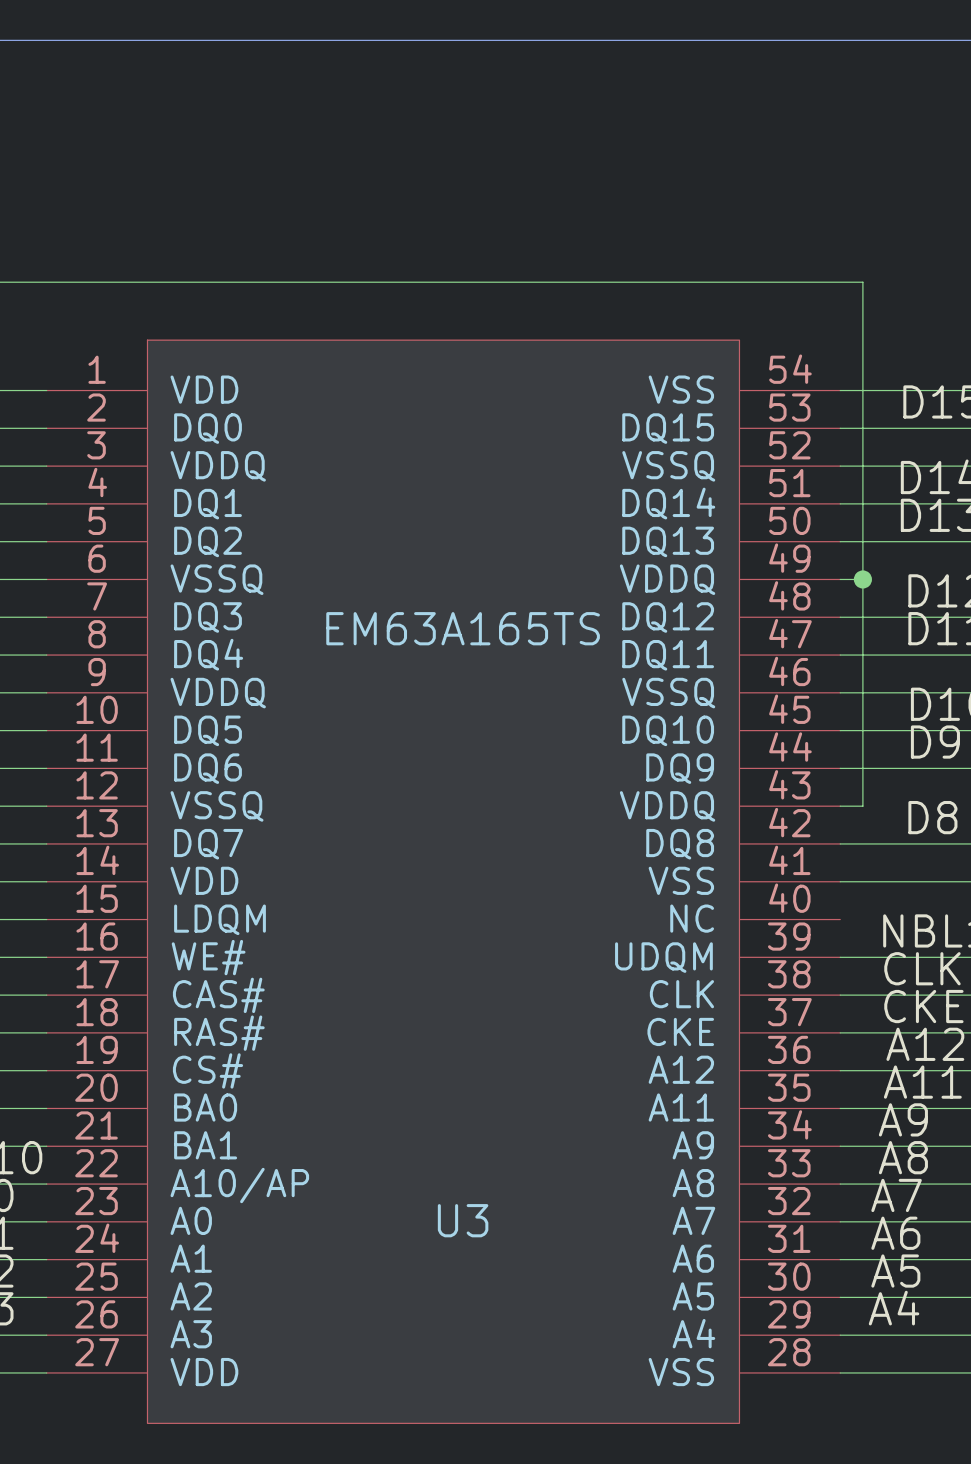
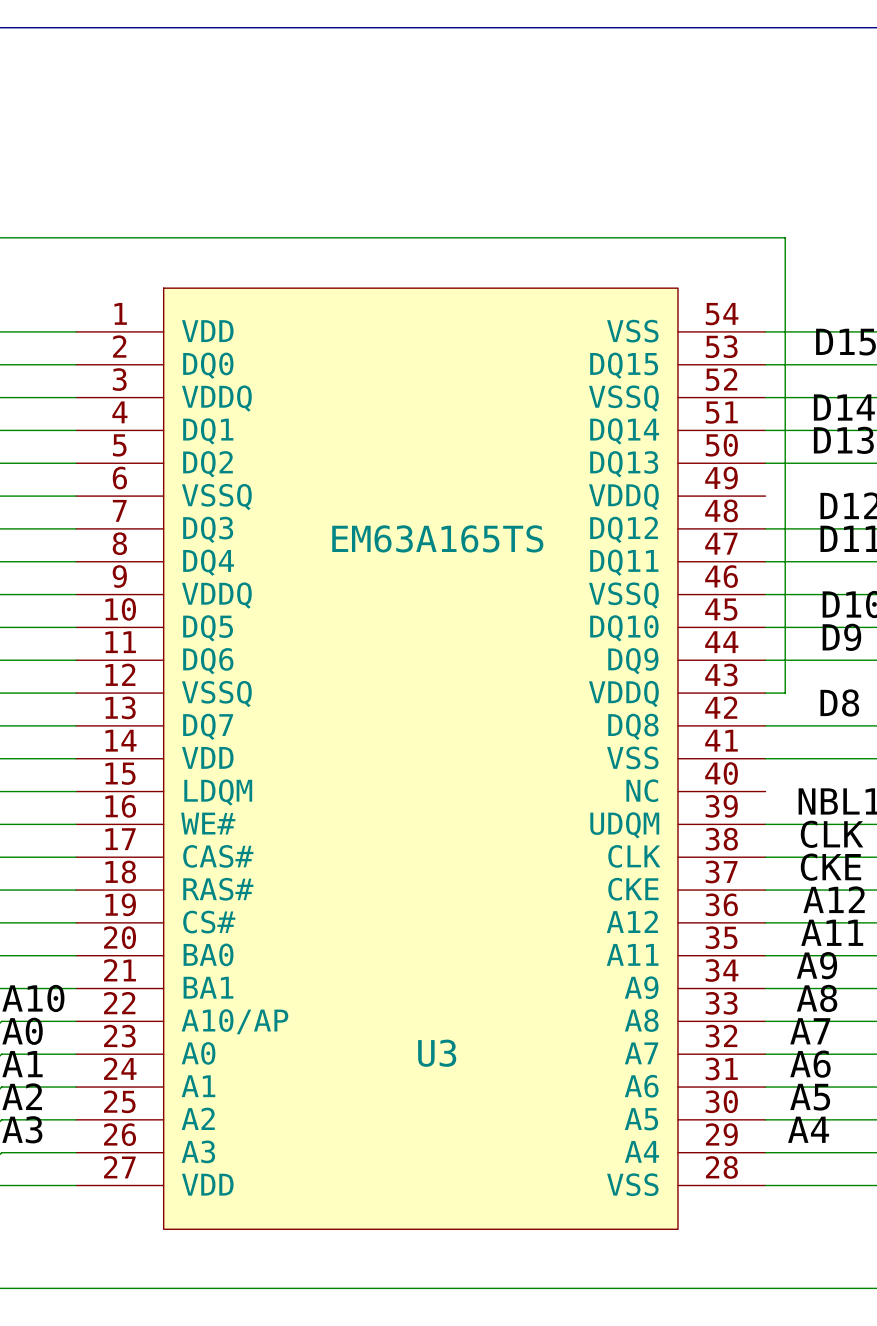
wire: (840, 579) (862, 579) -> none
junction: (862, 579) -> none

